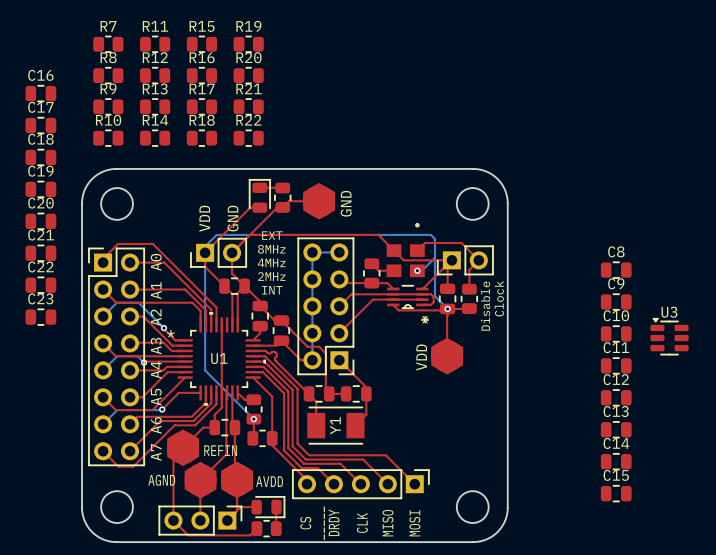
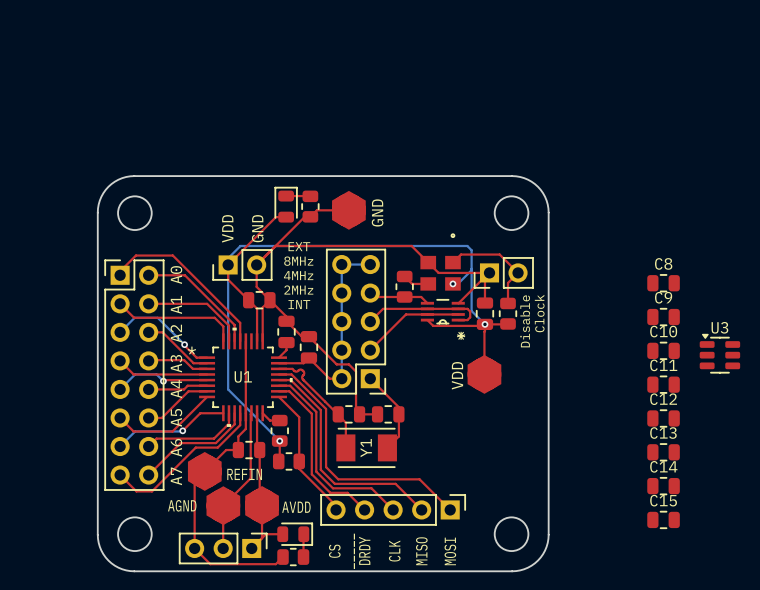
R7: (108, 44) -> none
R11: (155, 44) -> none
R15: (201, 44) -> none
R19: (248, 44) -> none
R8: (108, 75) -> none
R12: (155, 75) -> none
R16: (201, 75) -> none
R20: (248, 75) -> none
C16: (40, 93) -> none
R9: (108, 106) -> none
R13: (155, 106) -> none
R17: (201, 106) -> none
R21: (248, 106) -> none
C17: (40, 125) -> none
R10: (108, 138) -> none
R14: (155, 138) -> none
R18: (201, 138) -> none
R22: (248, 138) -> none
C18: (40, 157) -> none
C19: (40, 189) -> none
C20: (40, 221) -> none
C21: (40, 253) -> none
C22: (40, 285) -> none
C23: (40, 317) -> none

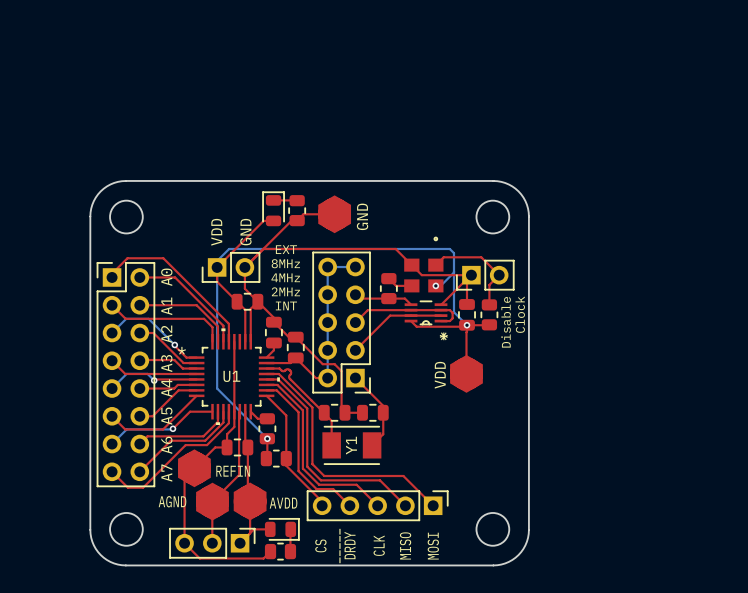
C8: (663, 283) -> none
C9: (663, 317) -> none
C10: (663, 350) -> none
U3: (719, 353) -> none
C11: (663, 384) -> none
C12: (663, 418) -> none
C13: (663, 452) -> none
C14: (663, 486) -> none
C15: (663, 519) -> none

